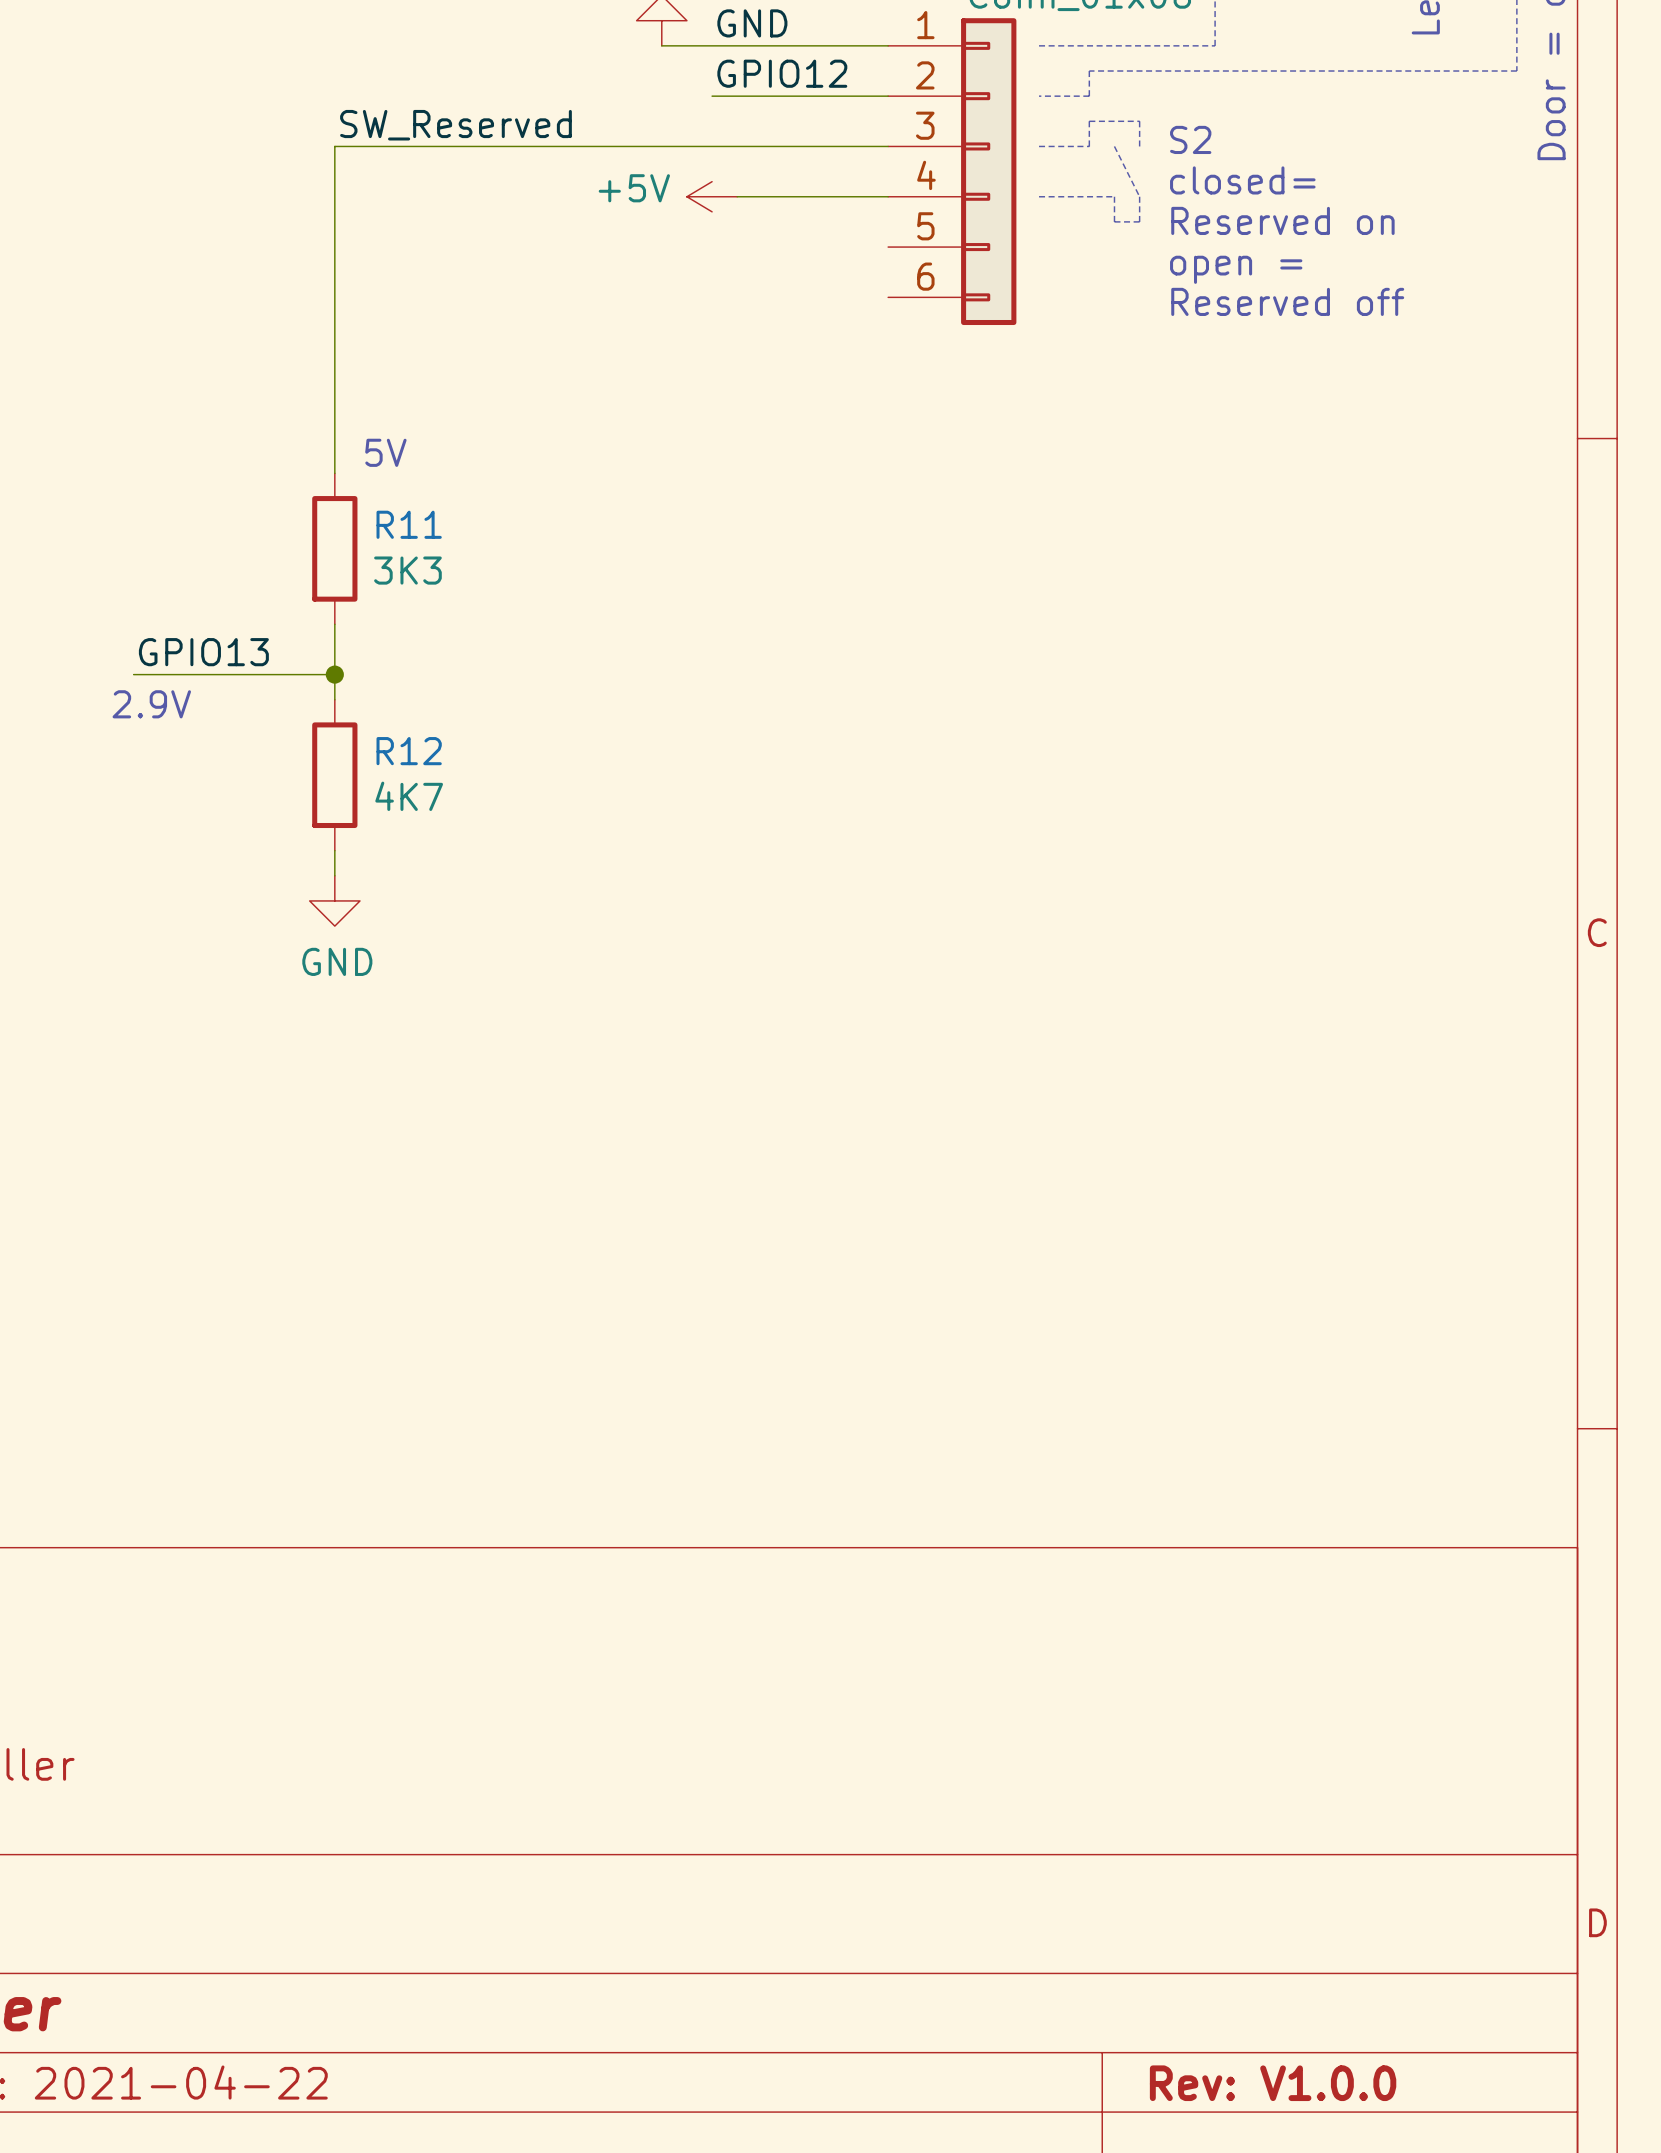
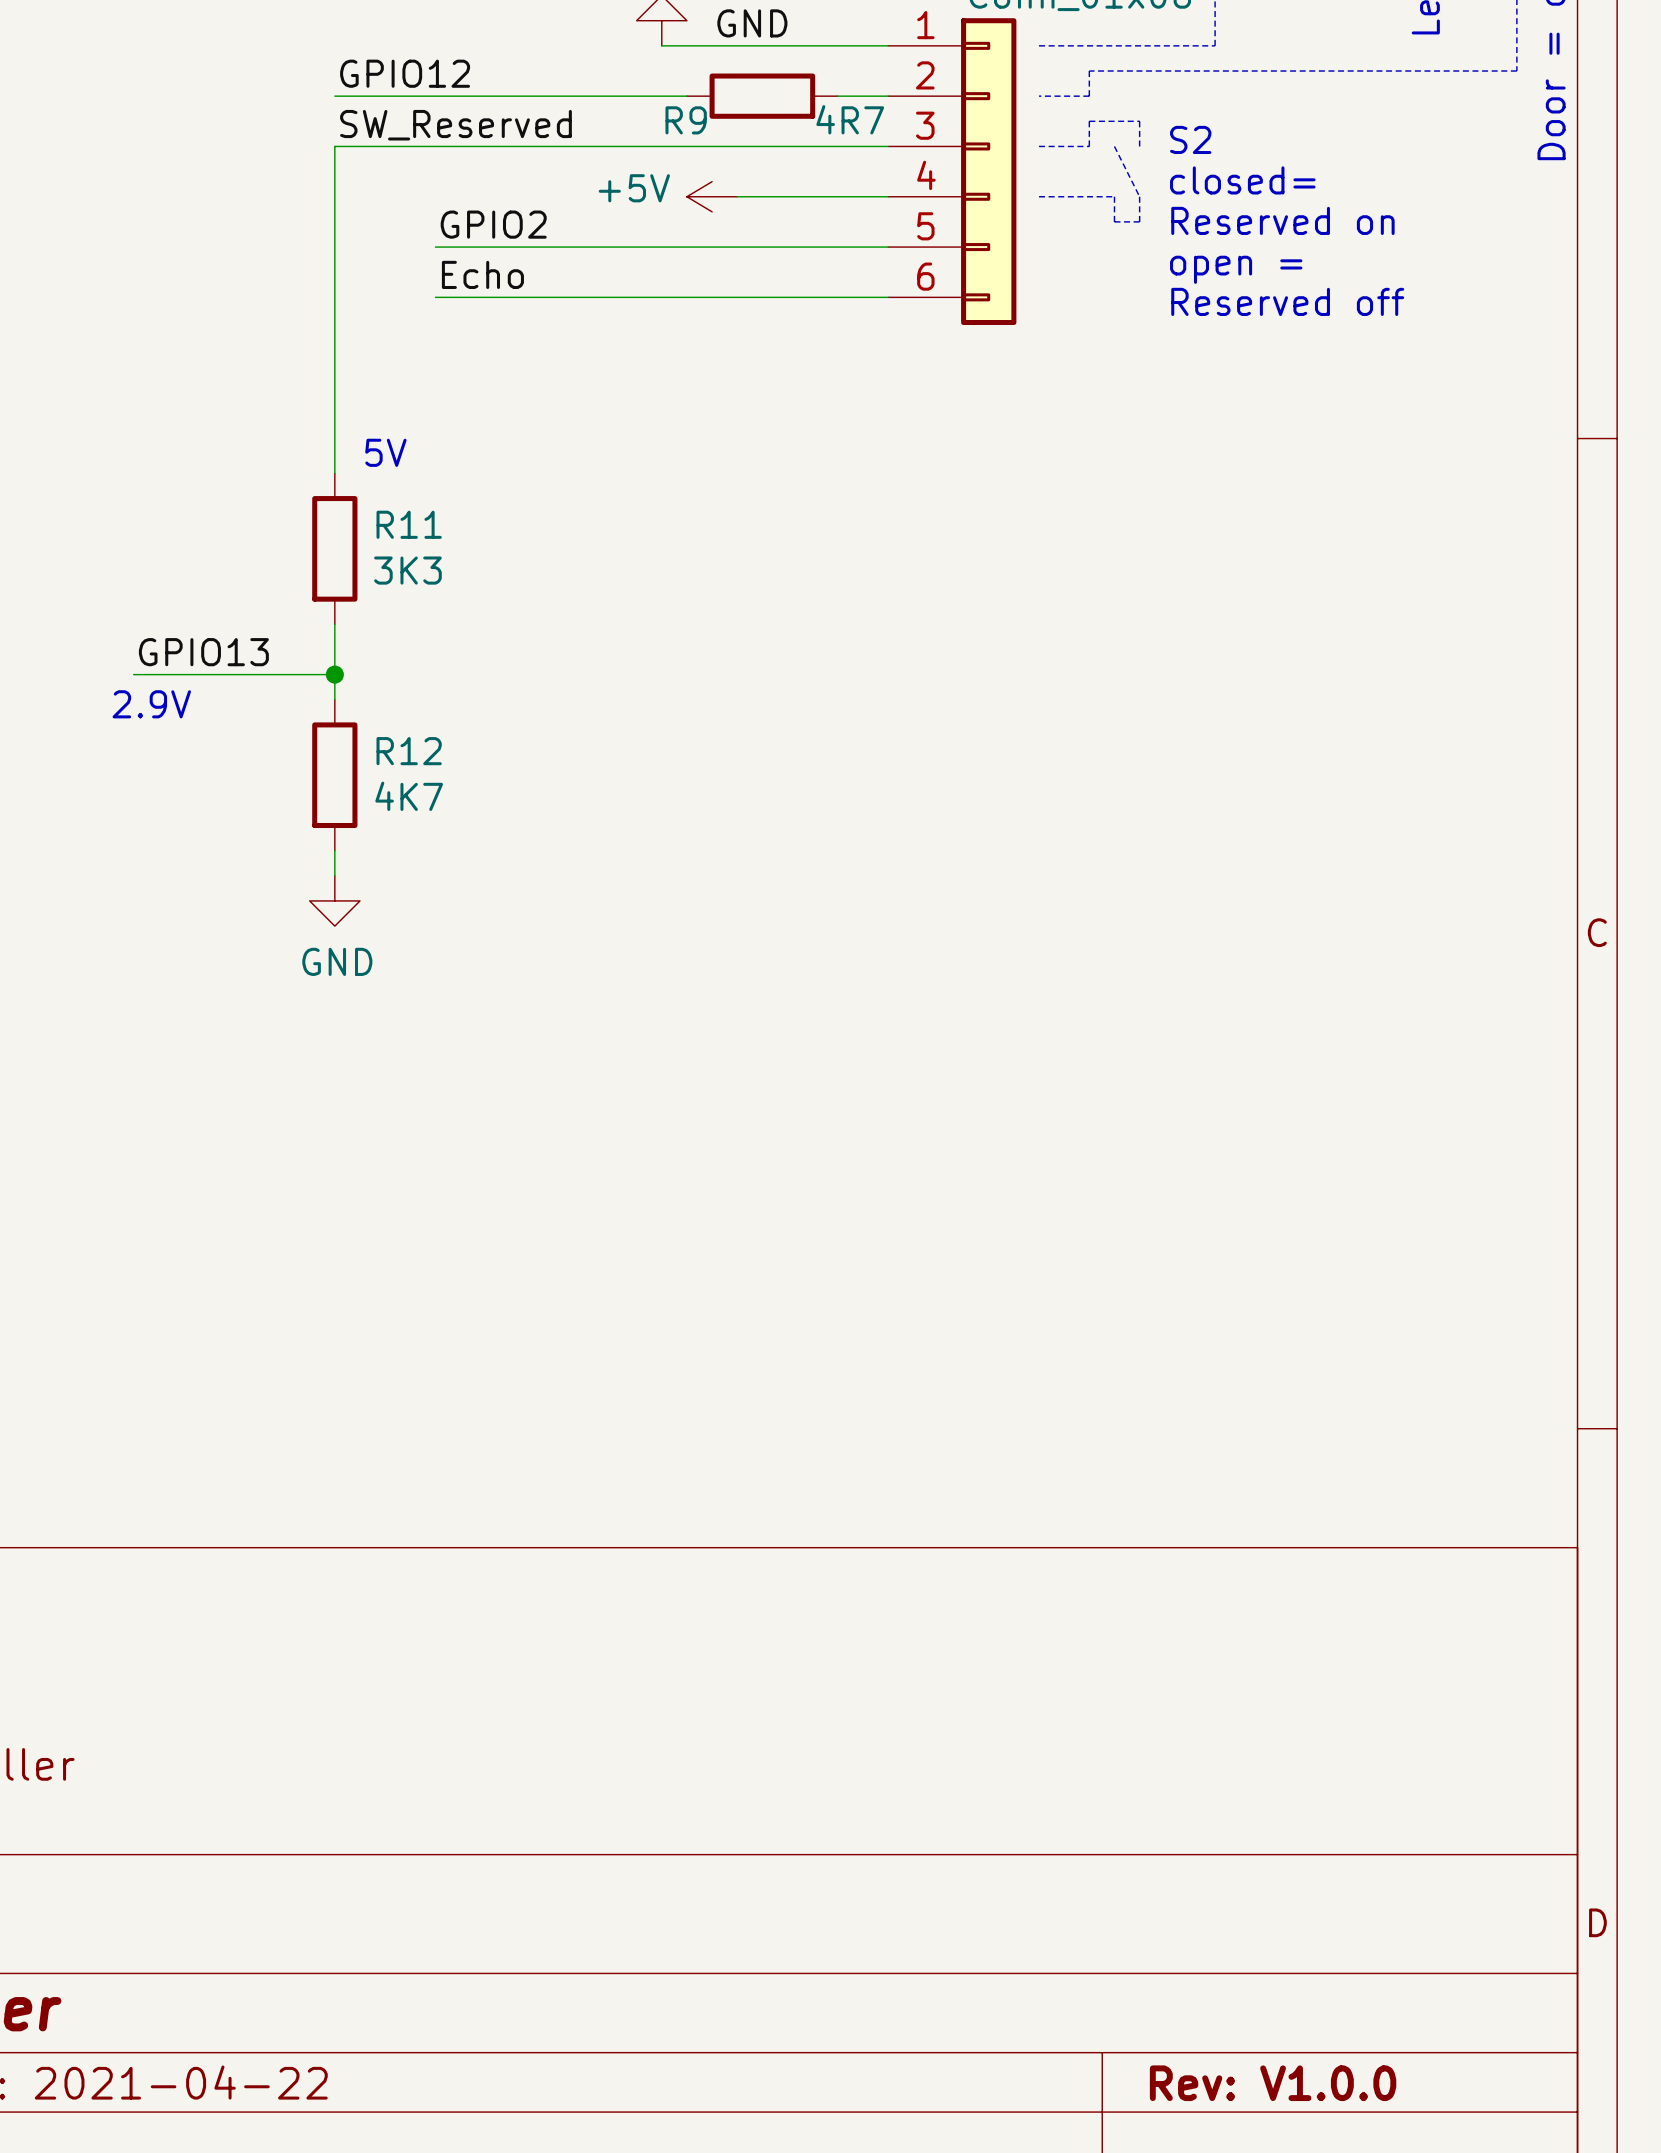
label position: GPIO12 (782, 73) -> GPIO12 (405, 73)
wire: none -> (334, 96) (686, 96)
wire: (712, 96) (837, 96) -> none
R9: none -> 4R7 (762, 96)
label: none -> GPIO2 (493, 224)
wire: none -> (435, 247) (888, 247)
label: none -> Echo (482, 274)
wire: none -> (435, 297) (888, 297)

